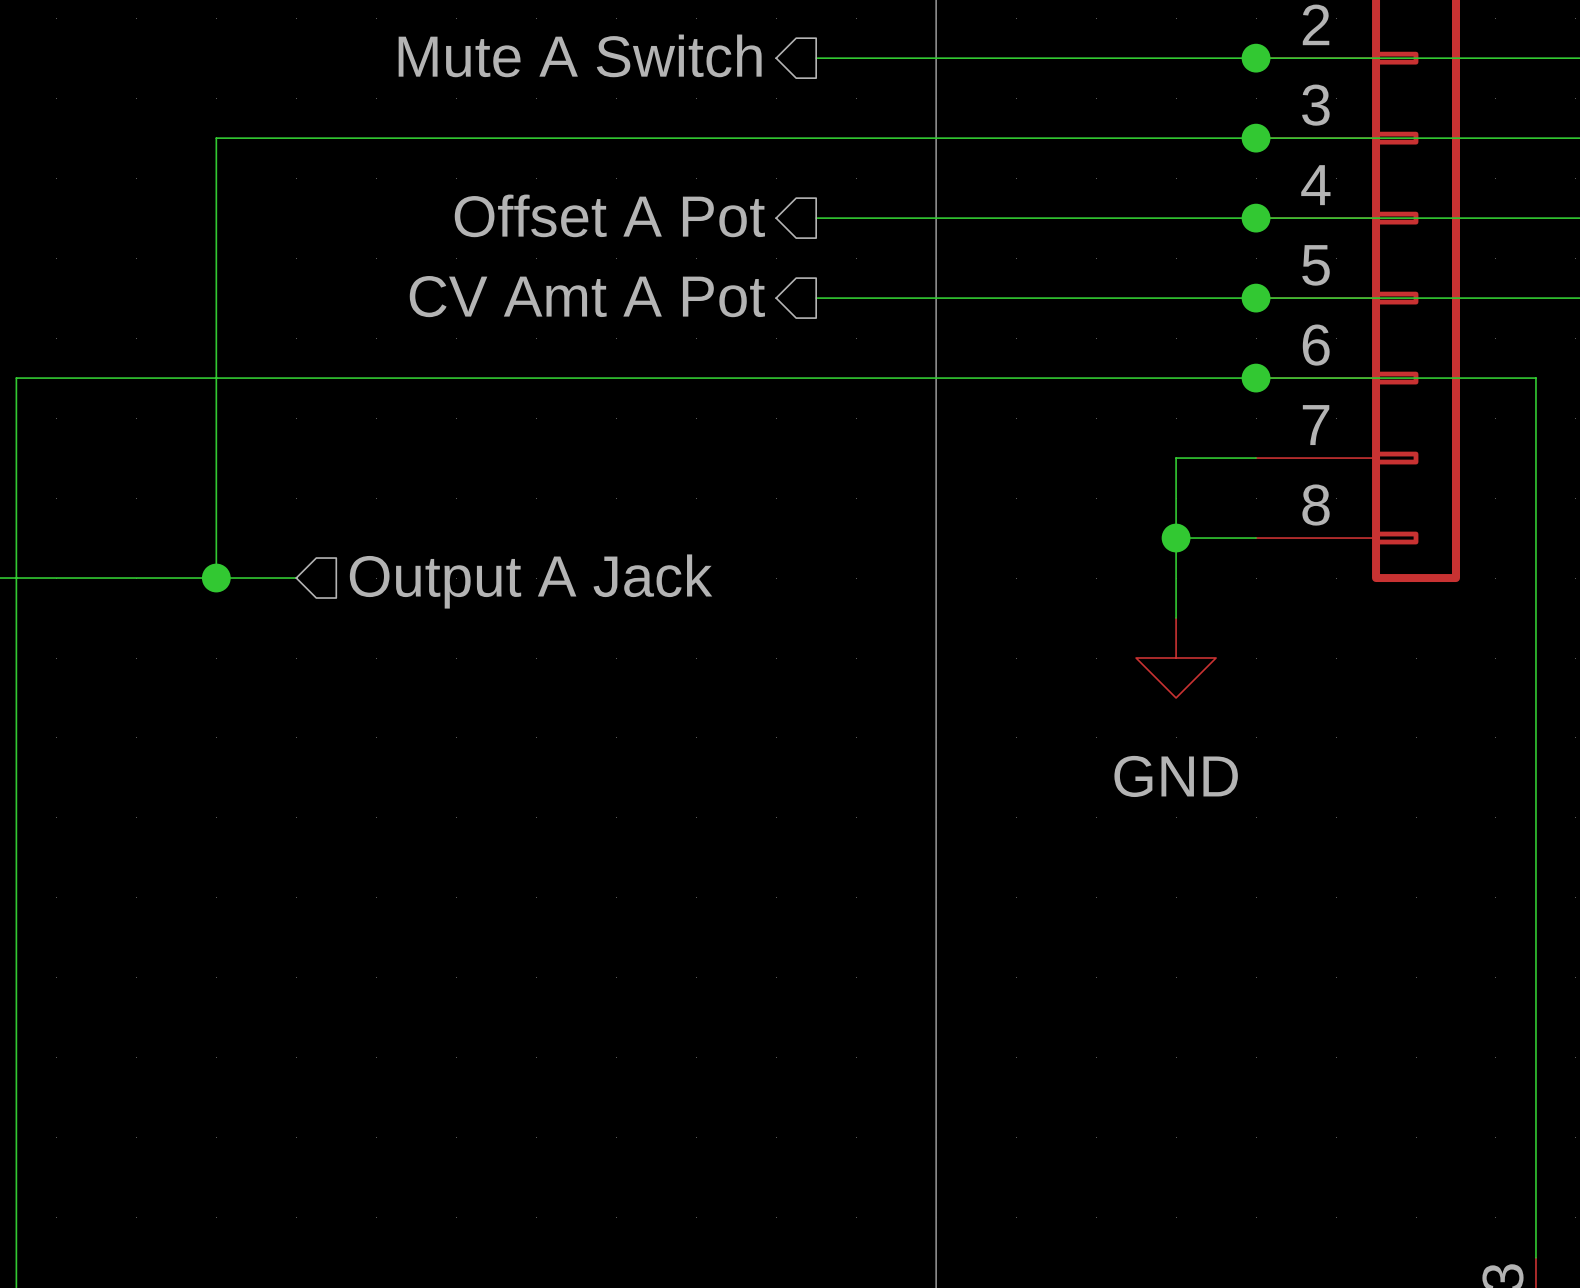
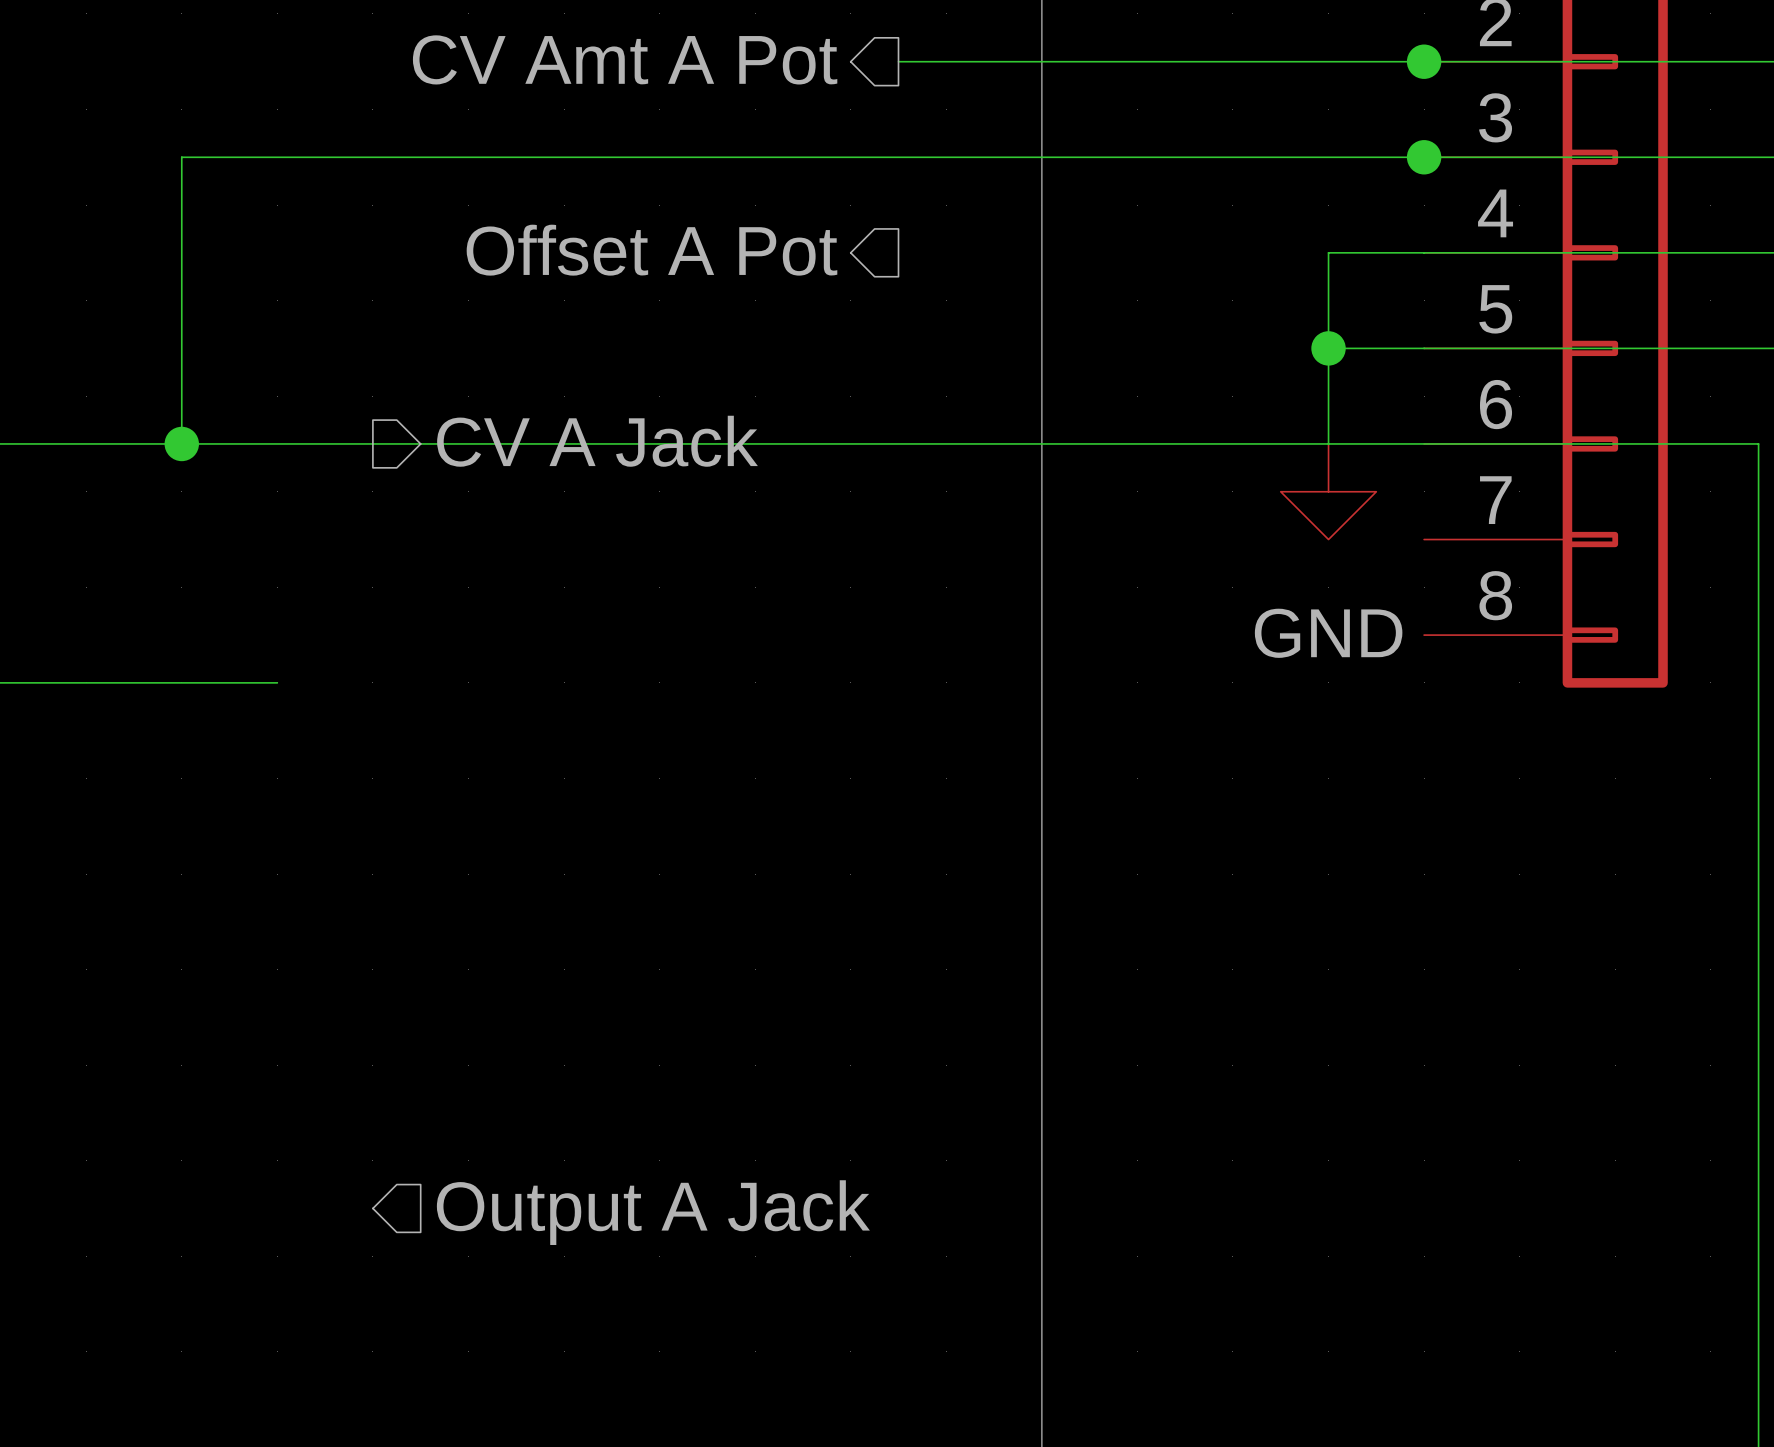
hierarchical label: Mute A Switch (580, 55) -> CV Amt A Pot (625, 59)
wire: (816, 218) (1176, 218) -> (1328, 443) (1328, 252)
junction: (1256, 218) -> none
hierarchical label: CV Amt A Pot (587, 296) -> none
wire: (816, 298) (1176, 298) -> none
junction: none -> (1328, 348)
junction: (1256, 298) -> none
hierarchical label: none -> CV A Jack (597, 441)
wire: (216, 378) (216, 578) -> none
junction: none -> (181, 443)
junction: (1256, 378) -> none
wire: (1256, 458) (1176, 458) (1176, 618) -> none
wire: (1176, 538) (1256, 538) -> none
junction: (1176, 538) -> none
junction: (216, 578) -> none
hierarchical label position: Output A Jack (531, 581) -> Output A Jack (653, 1212)
power symbol position: GND (1176, 658) -> GND (1328, 491)

